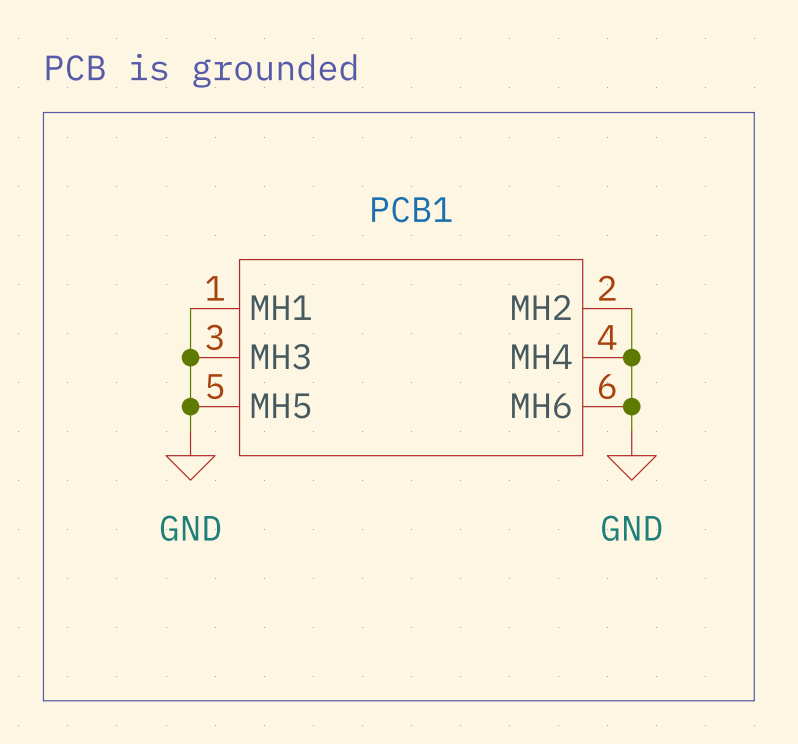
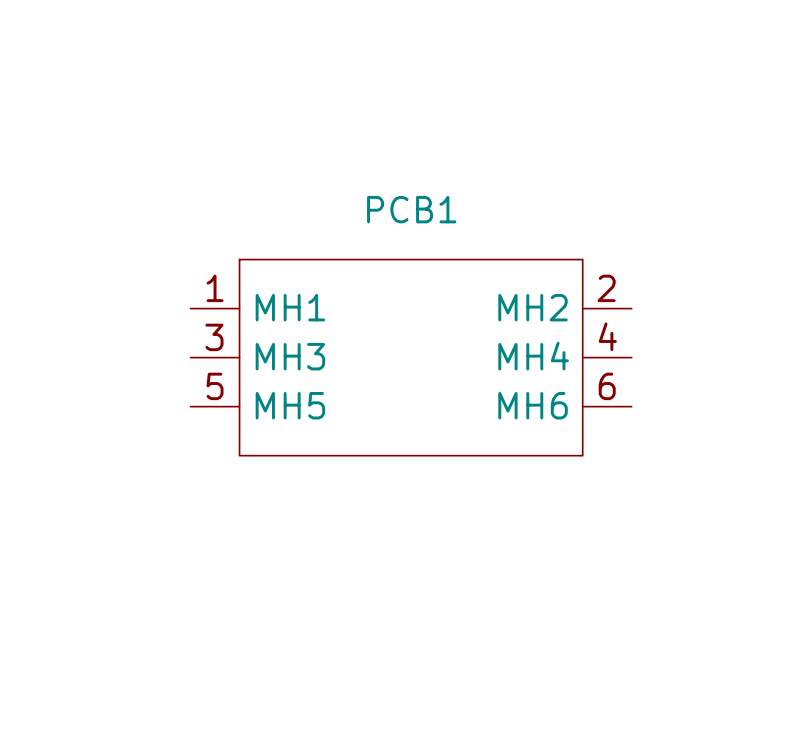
text: PCB is grounded (201, 70) -> none
line: (43, 112) (754, 112) (754, 700) (43, 700) (43, 112) -> none
wire: (190, 308) (190, 431) -> none
wire: (631, 308) (631, 431) -> none
junction: (190, 357) -> none
junction: (631, 357) -> none
junction: (190, 406) -> none
junction: (631, 406) -> none
power symbol: GND (190, 455) -> none
power symbol: GND (631, 455) -> none

